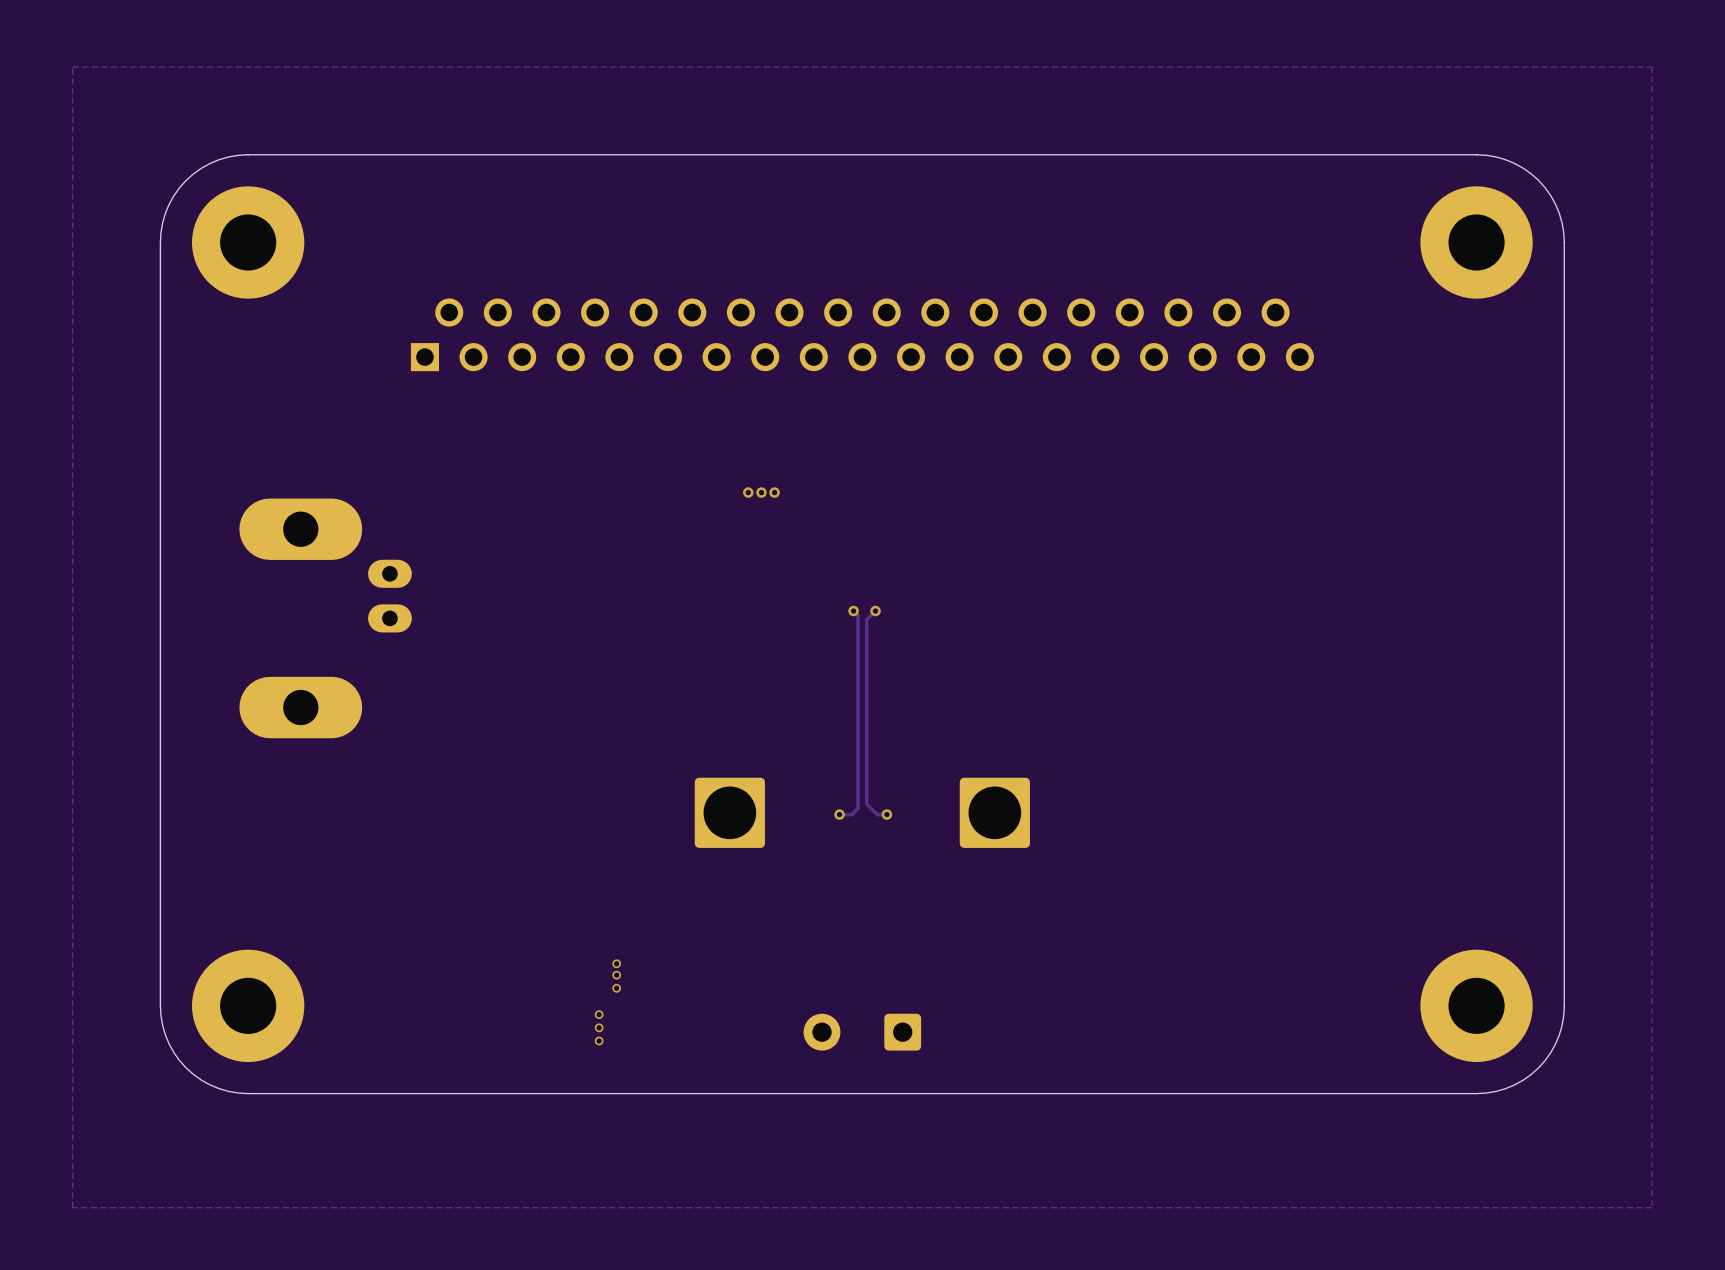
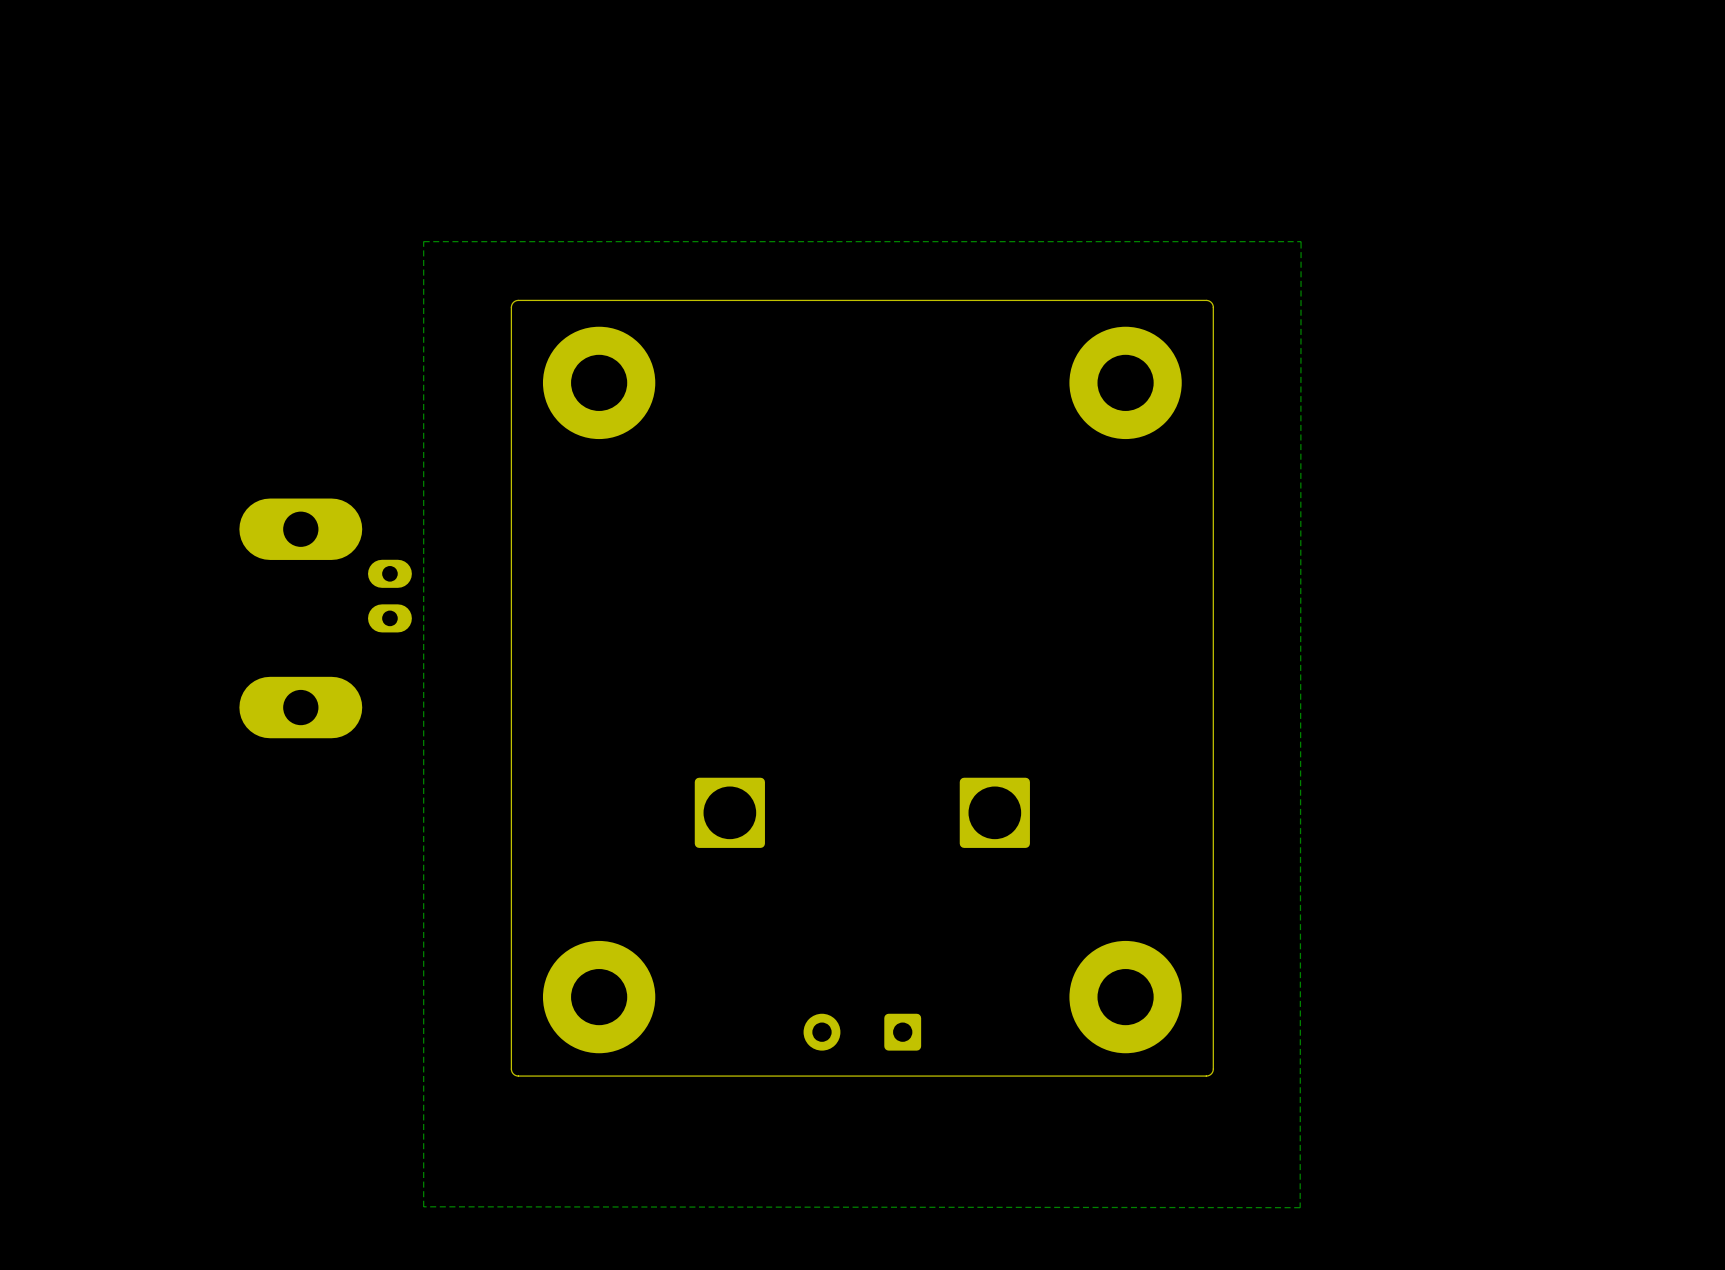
zone outline: (1652, 67) (1652, 1207) (72, 1207) (72, 67) (1652, 67) -> none
board edge: (1476, 154) (248, 154) (219, 159) (201, 168) (179, 187) (169, 204) (162, 222) (160, 242) (160, 1005) (162, 1025) (173, 1052) (186, 1067) (201, 1080) (219, 1088) (248, 1093) (1476, 1093) (1496, 1091) (1523, 1080) (1538, 1067) (1550, 1052) (1559, 1034) (1564, 1005) (1564, 242) (1559, 213) (1550, 195) (1538, 180) (1514, 163) (1496, 156) (1476, 154) -> none
zone outline: none -> (1301, 241) (423, 241) (423, 1206) (1300, 1207) (1301, 241)
part: (248, 242) -> none
part: (1476, 242) -> none
board edge: none -> (1206, 300) (518, 300) (513, 302) (511, 307) (511, 1069) (513, 1074) (518, 1076) (1206, 1076) (1211, 1074) (1213, 1069) (1213, 307) (1211, 302) (1206, 300)
part: (862, 334) -> none
part: none -> (599, 382)
part: none -> (1125, 382)
via: (748, 492) -> none
via: (761, 492) -> none
via: (774, 492) -> none
track: (853, 611) (857, 615) (857, 808) (851, 814) (839, 814) -> none
via: (853, 611) -> none
track: (875, 611) (866, 619) (866, 804) (877, 814) (886, 814) -> none
via: (875, 611) -> none
via: (839, 814) -> none
via: (886, 814) -> none
via: (616, 963) -> none
via: (616, 975) -> none
via: (616, 988) -> none
part position: (248, 1005) -> (599, 997)
part position: (1476, 1005) -> (1125, 997)
via: (599, 1014) -> none
via: (599, 1027) -> none
via: (599, 1040) -> none

